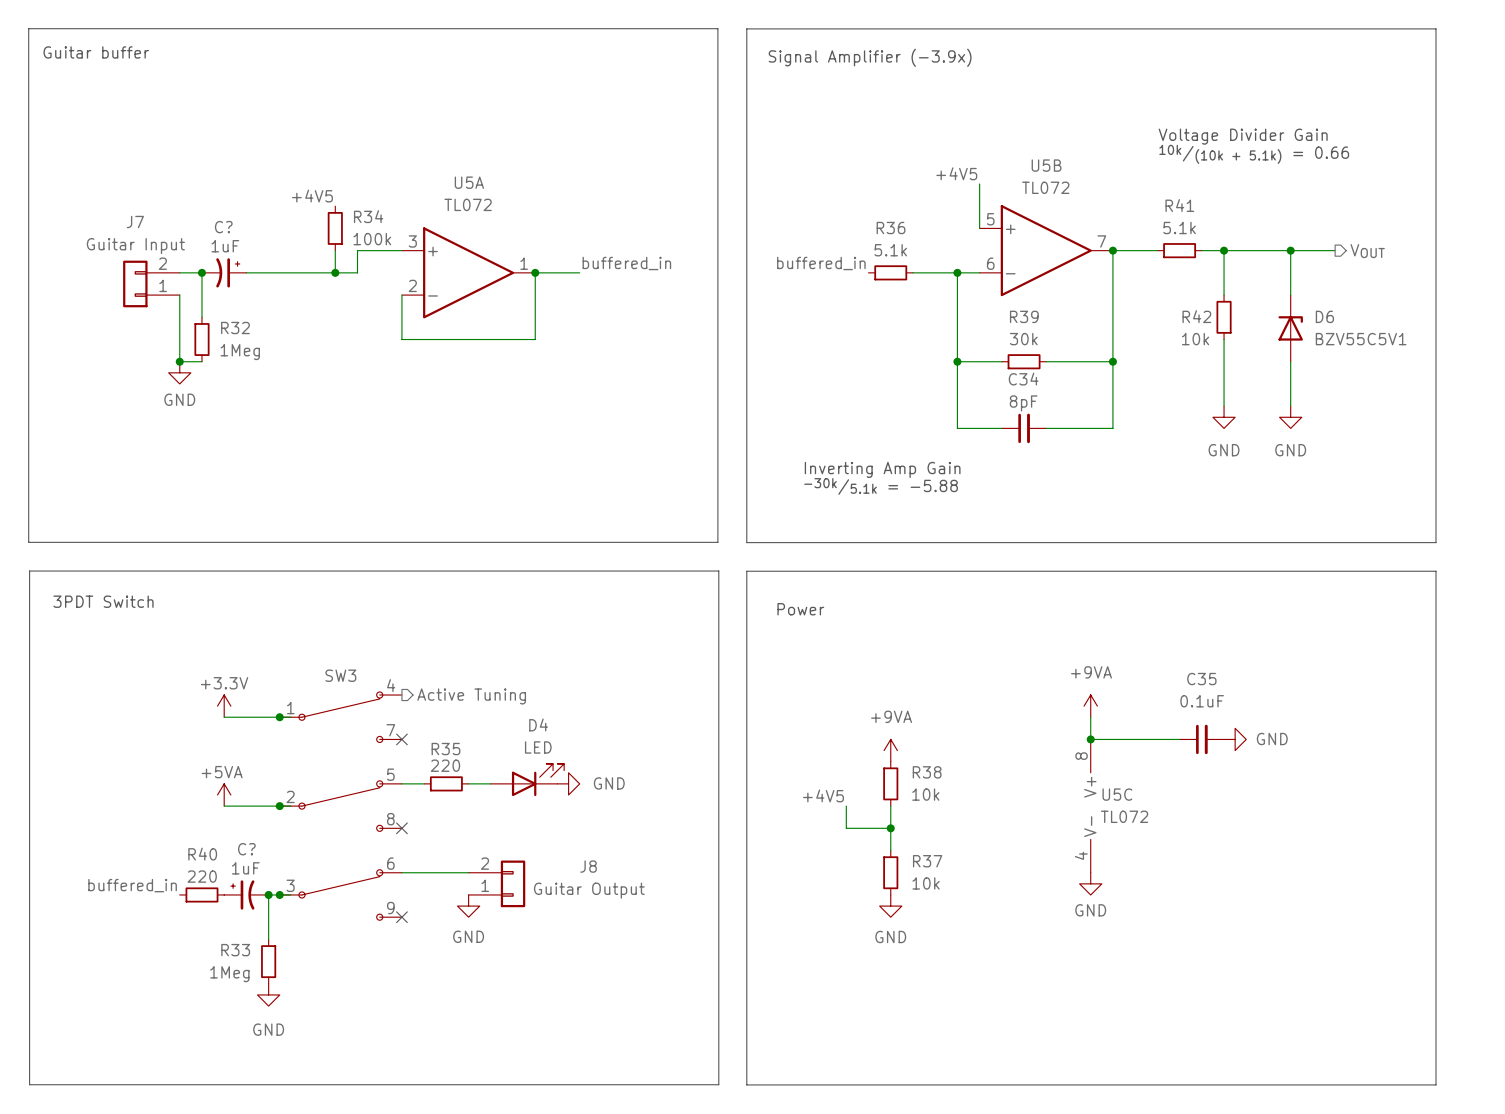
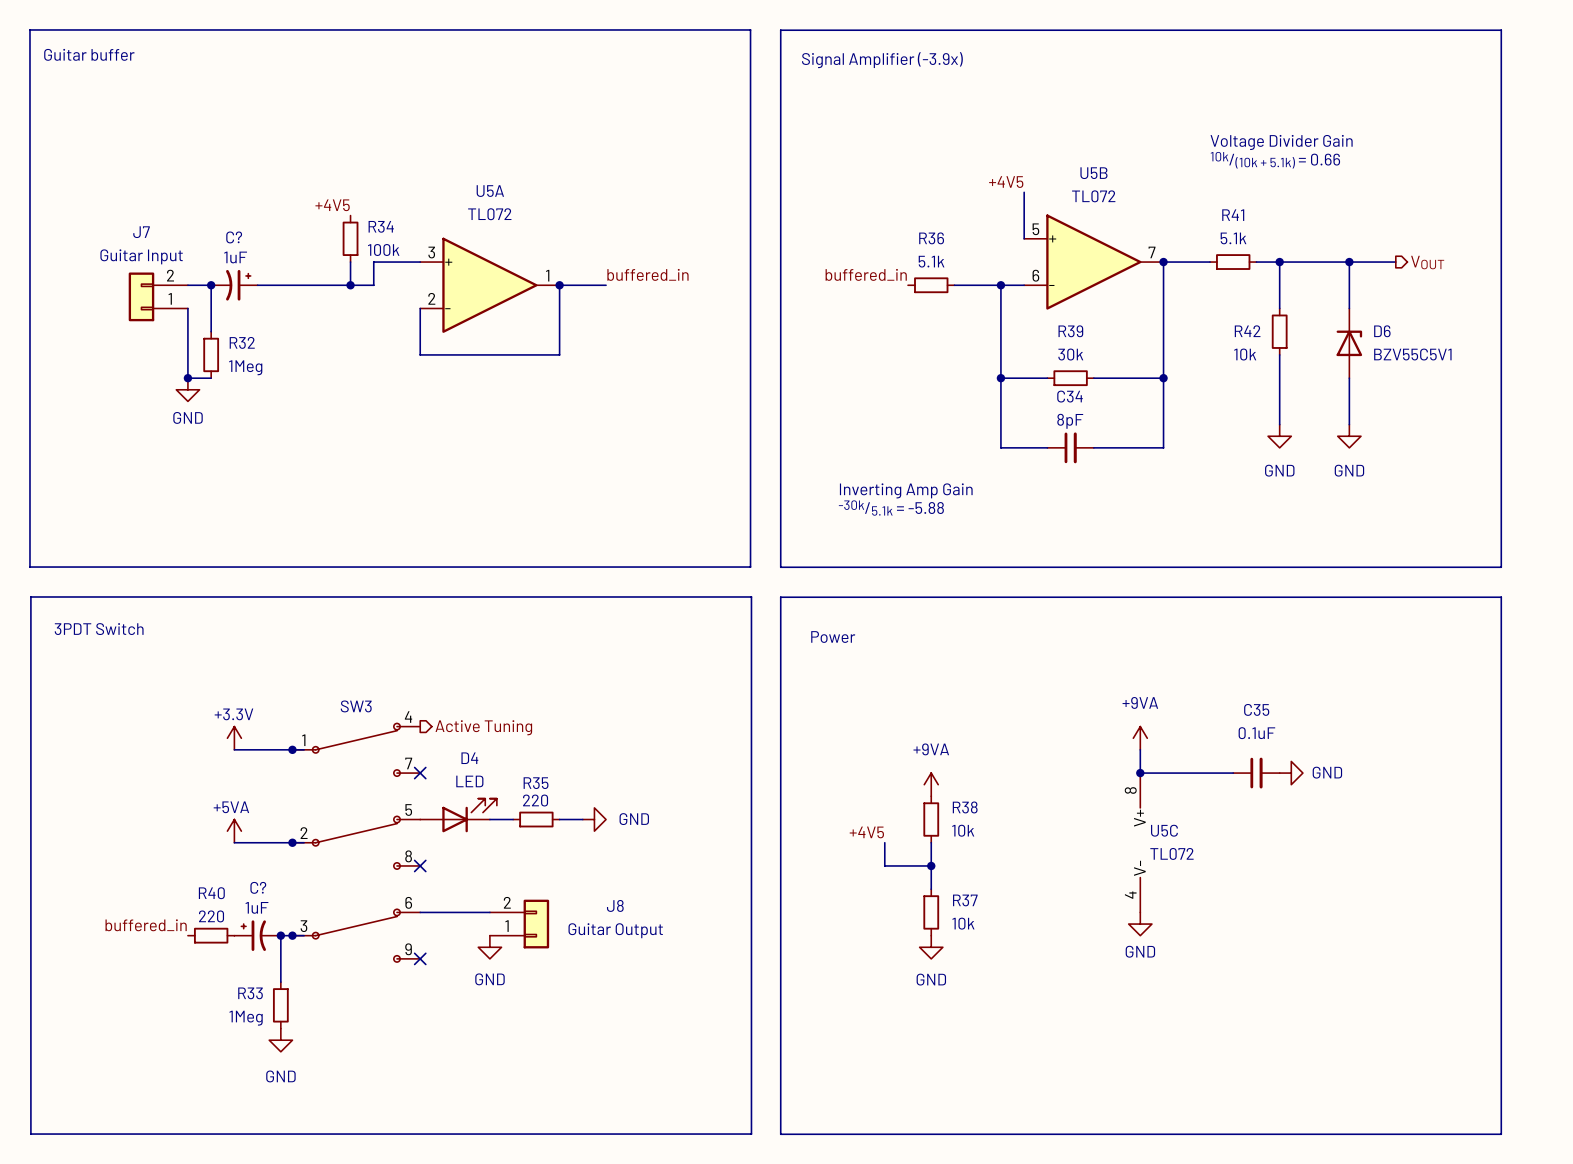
D4 position: (527, 779) -> (458, 815)
R35 position: (446, 783) -> (536, 819)

